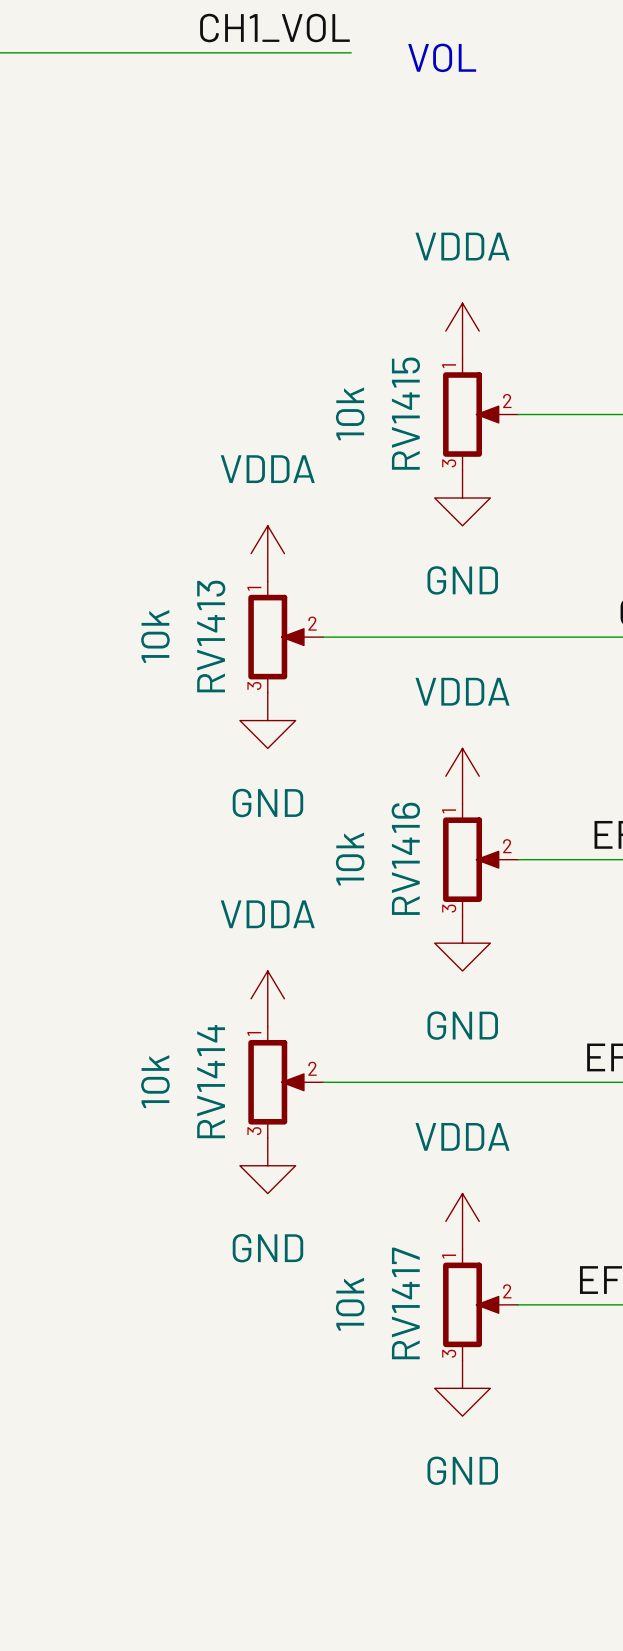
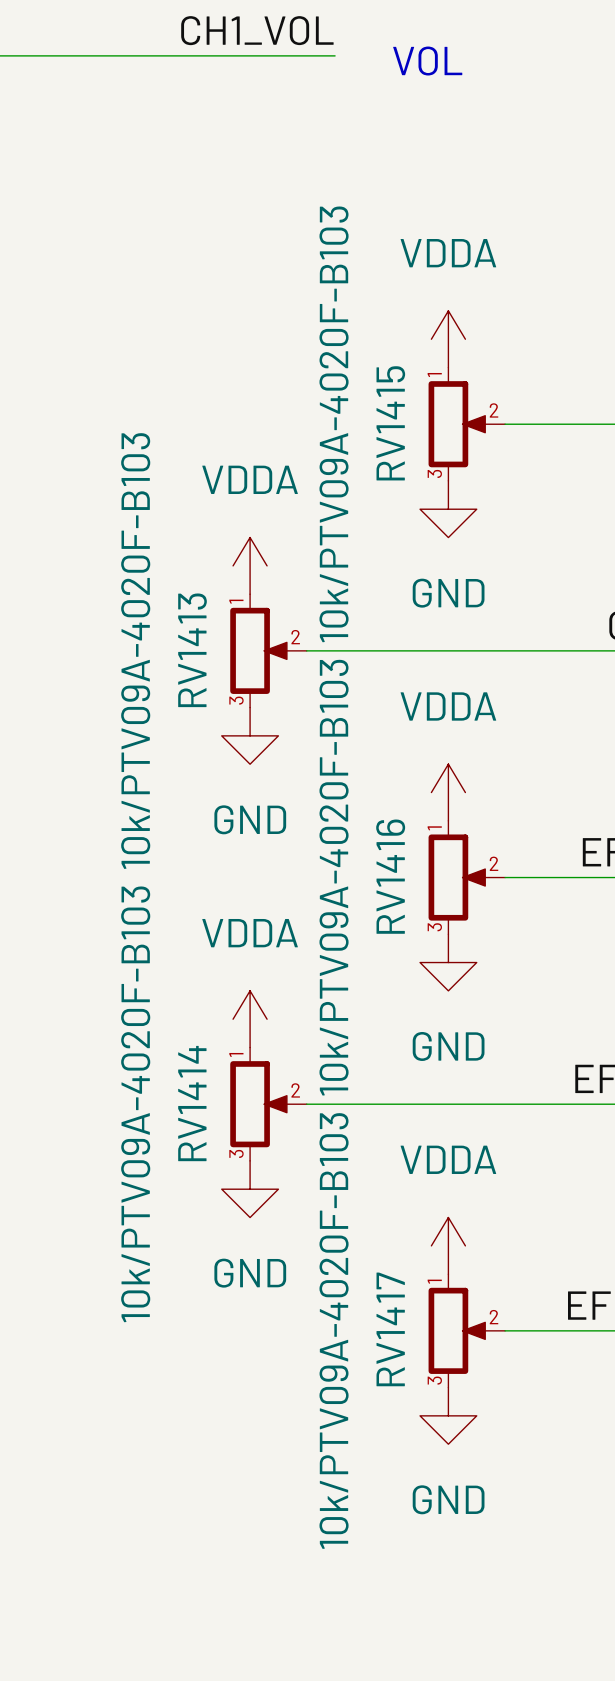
RV1415 value: 10k (350, 413) -> 10k/PTV09A-4020F-B103 (334, 424)
RV1413 value: 10k (155, 636) -> 10k/PTV09A-4020F-B103 (135, 651)
RV1416 value: 10k (350, 859) -> 10k/PTV09A-4020F-B103 (334, 877)
RV1414 value: 10k (155, 1081) -> 10k/PTV09A-4020F-B103 (135, 1104)
RV1417 value: 10k (350, 1304) -> 10k/PTV09A-4020F-B103 (334, 1331)

